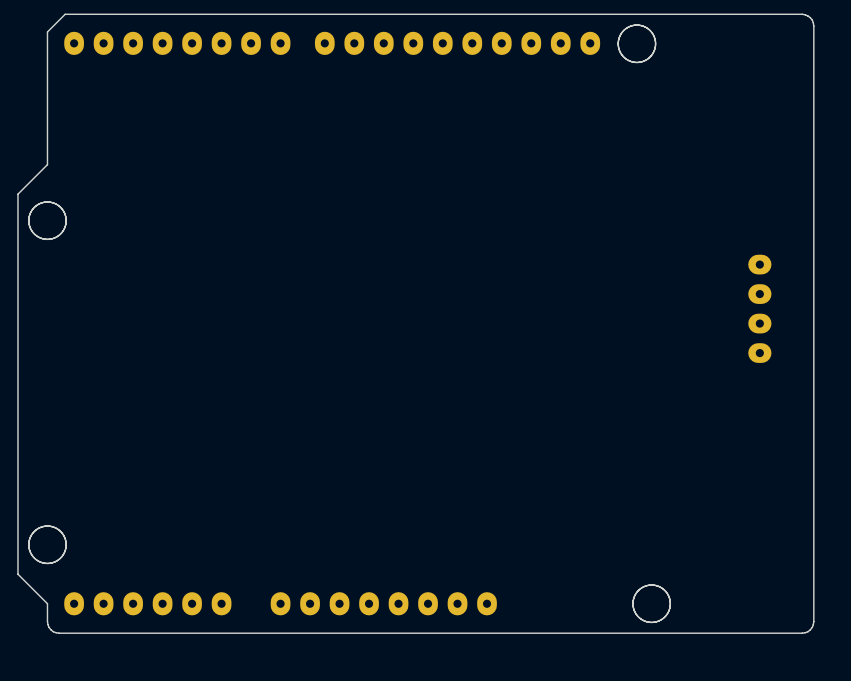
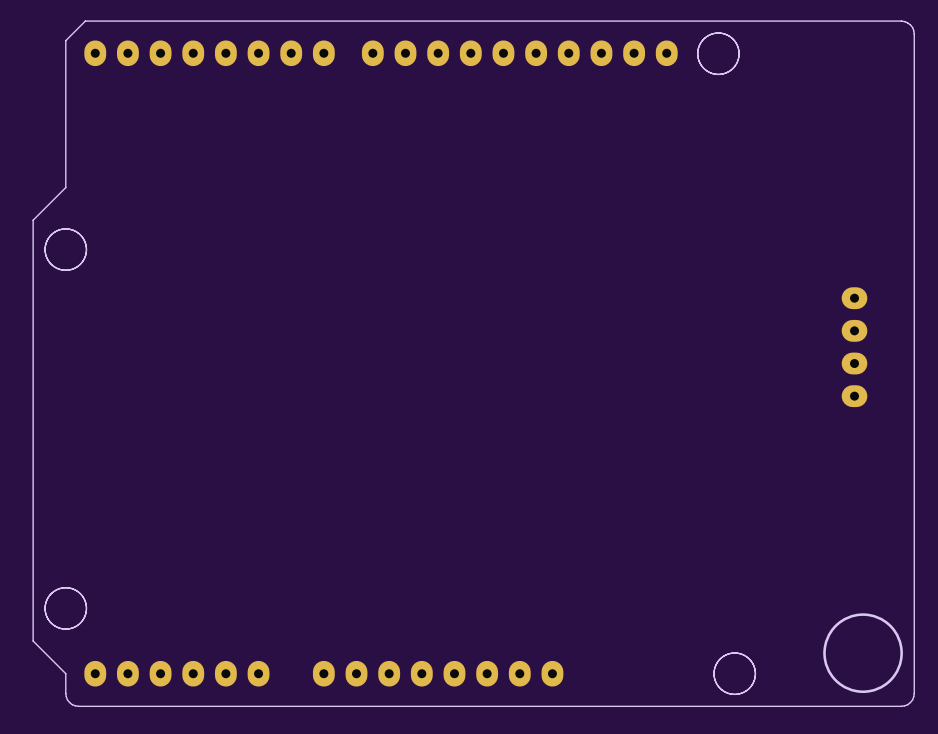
round board edge: none -> [823, 613, 903, 694]

